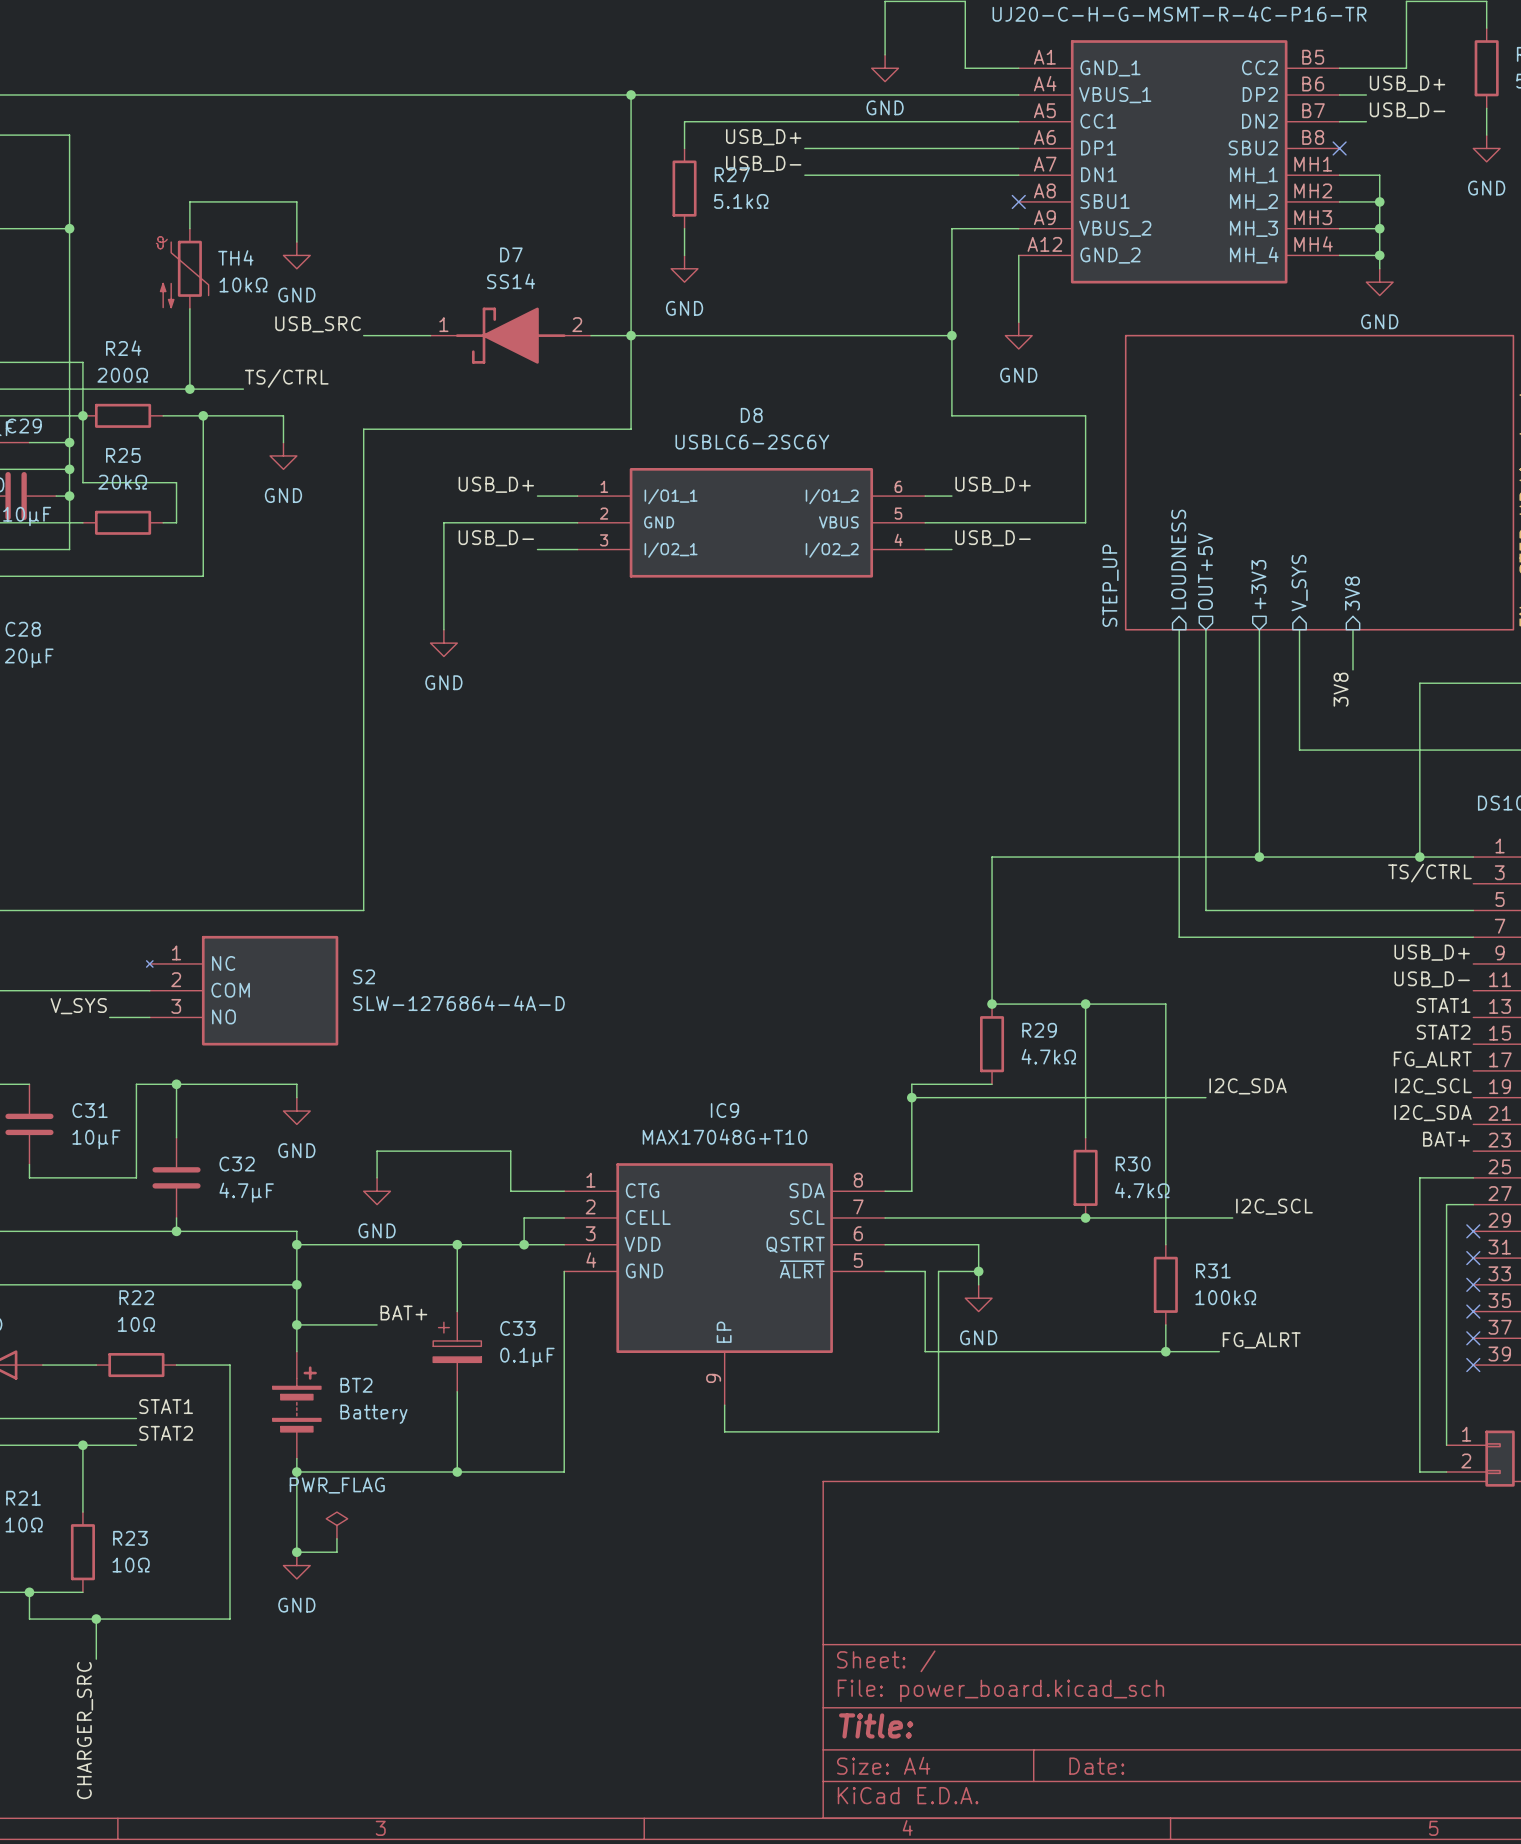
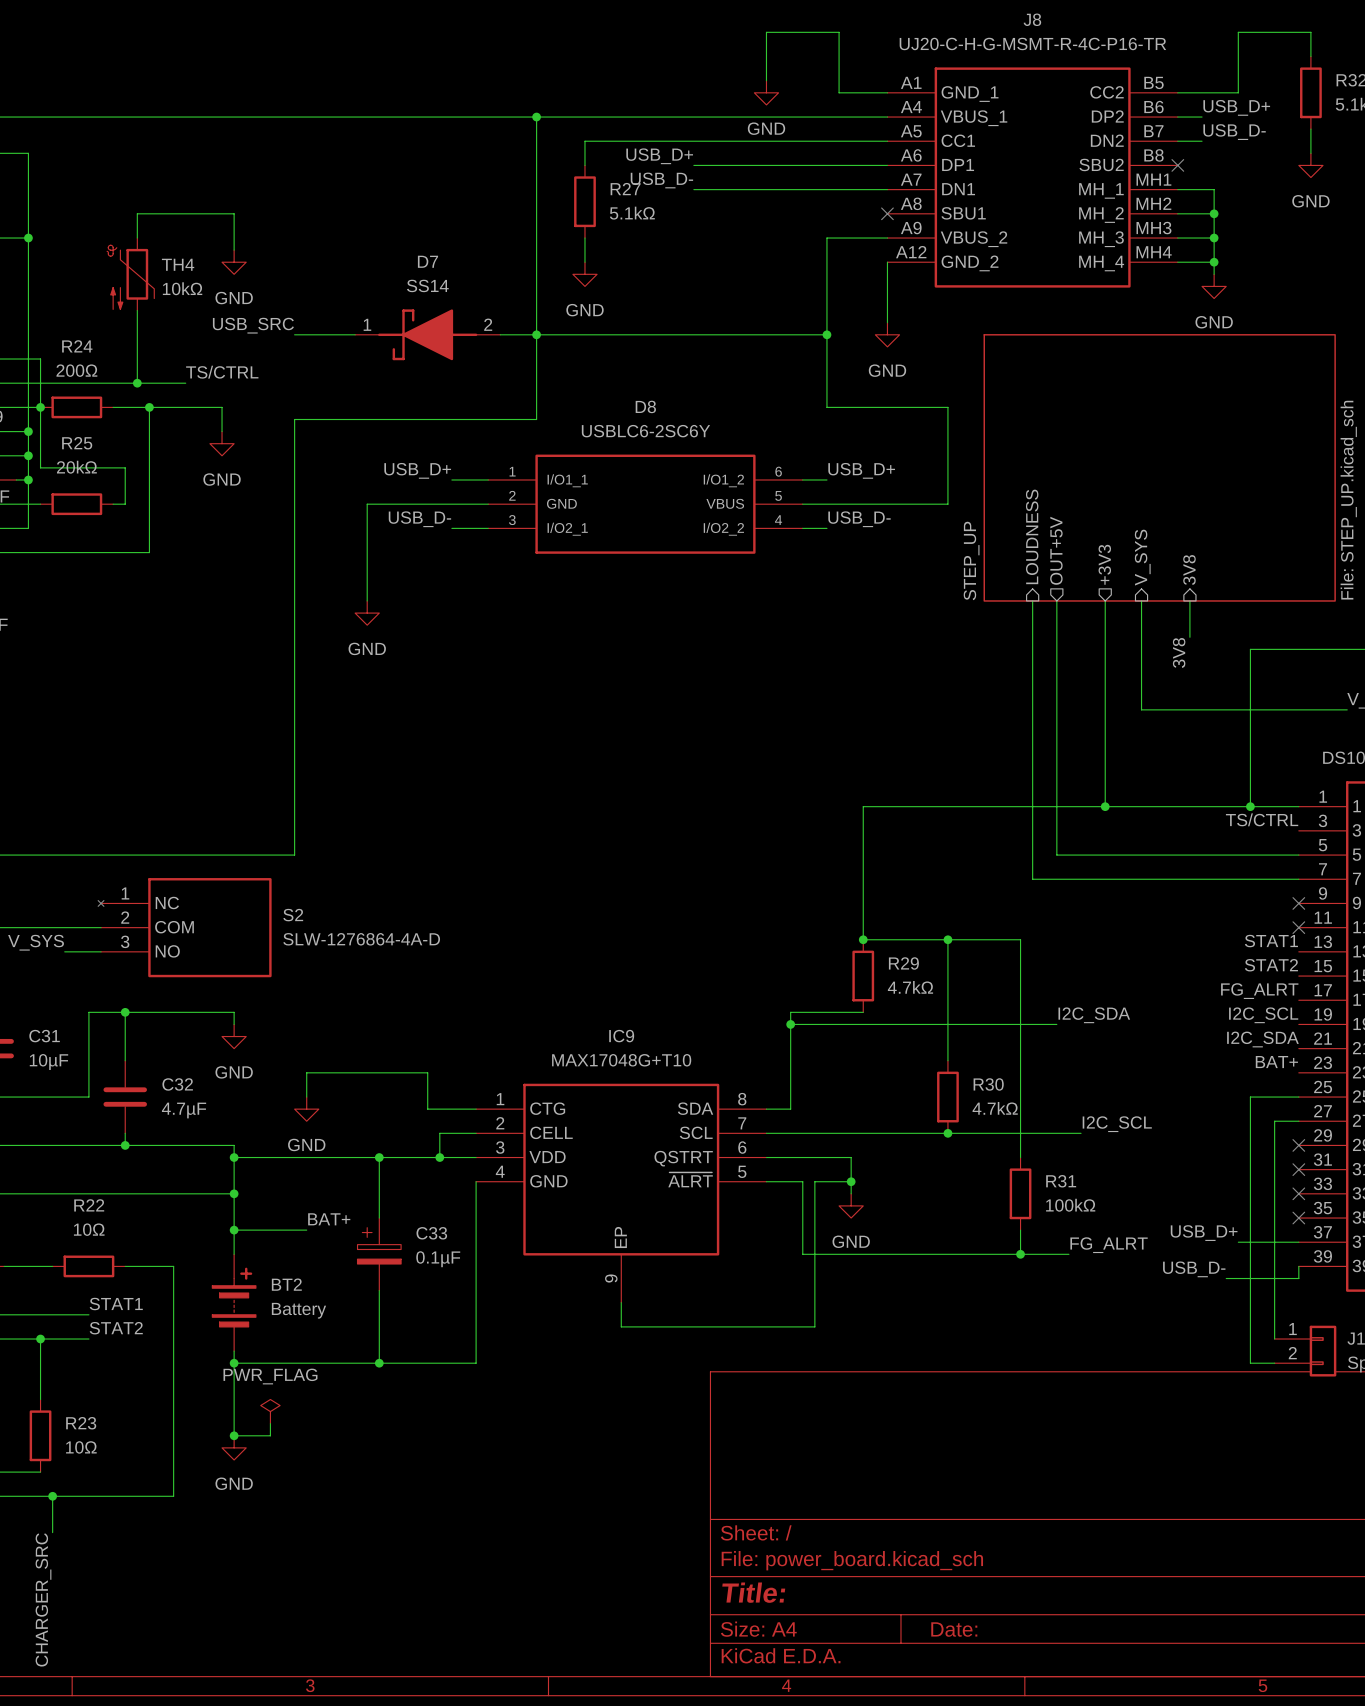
label: USB_D+ (1432, 952) -> none
no-connect mark: none -> (1298, 903)
label: USB_D- (1432, 979) -> none
no-connect mark: none -> (1298, 927)
label: none -> USB_D+ (1204, 1233)
wire: none -> (1238, 1242) (1298, 1242)
no-connect mark: (1473, 1338) -> none
wire: none -> (1298, 1266) (1298, 1278) (1226, 1278)
no-connect mark: (1473, 1365) -> none
label: none -> USB_D- (1194, 1269)

